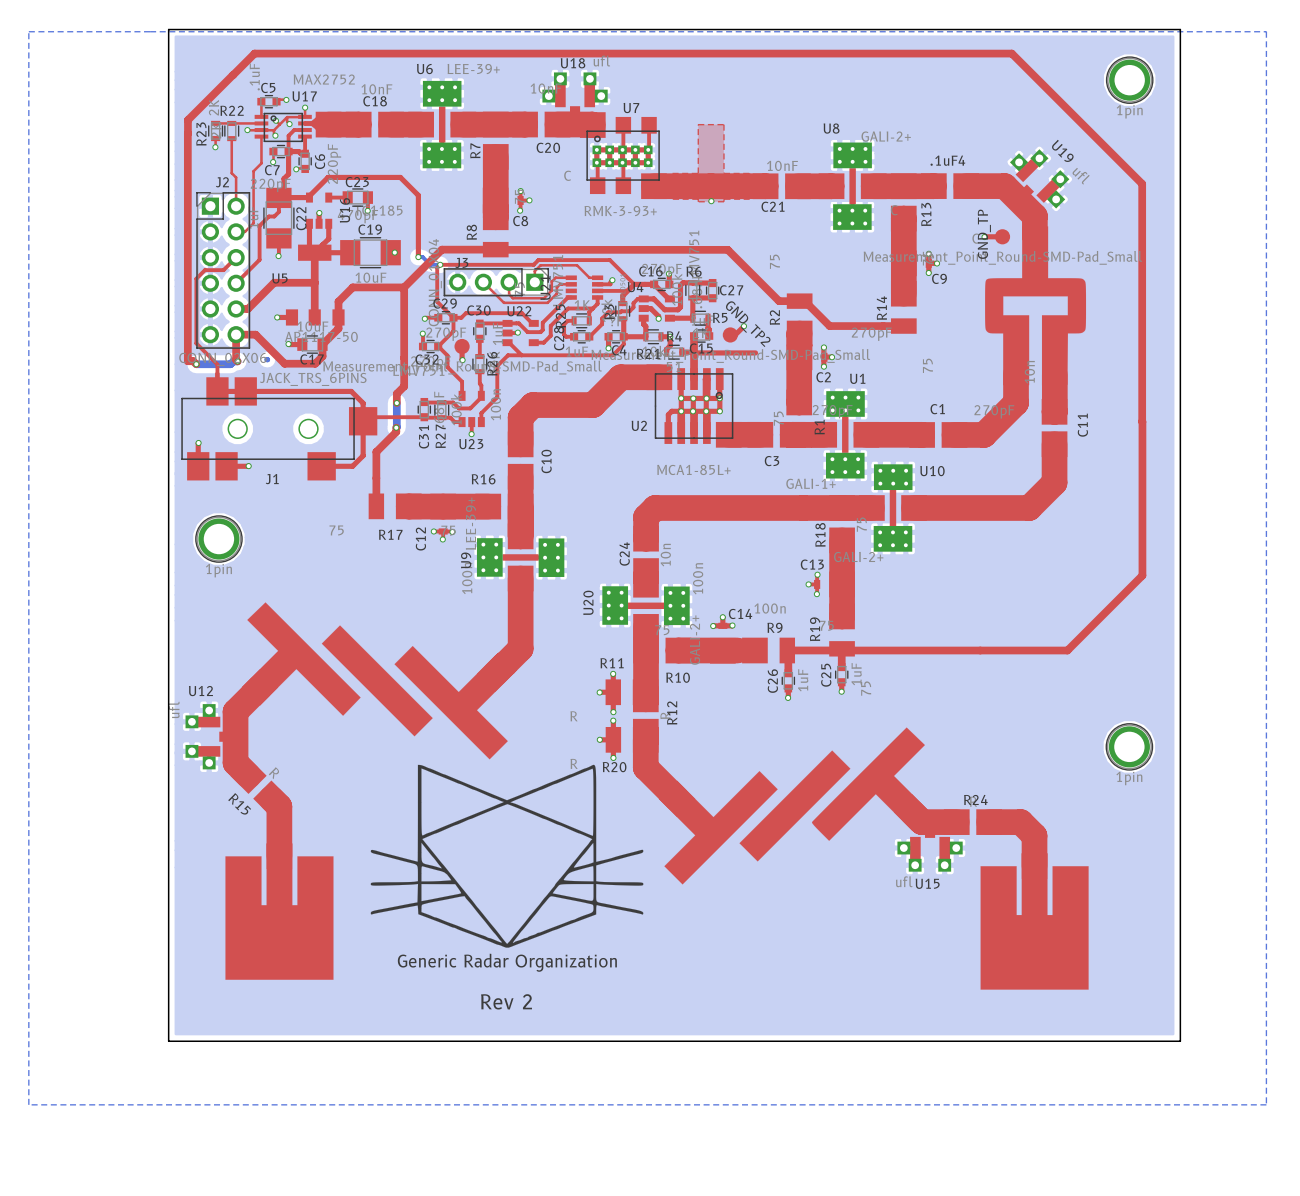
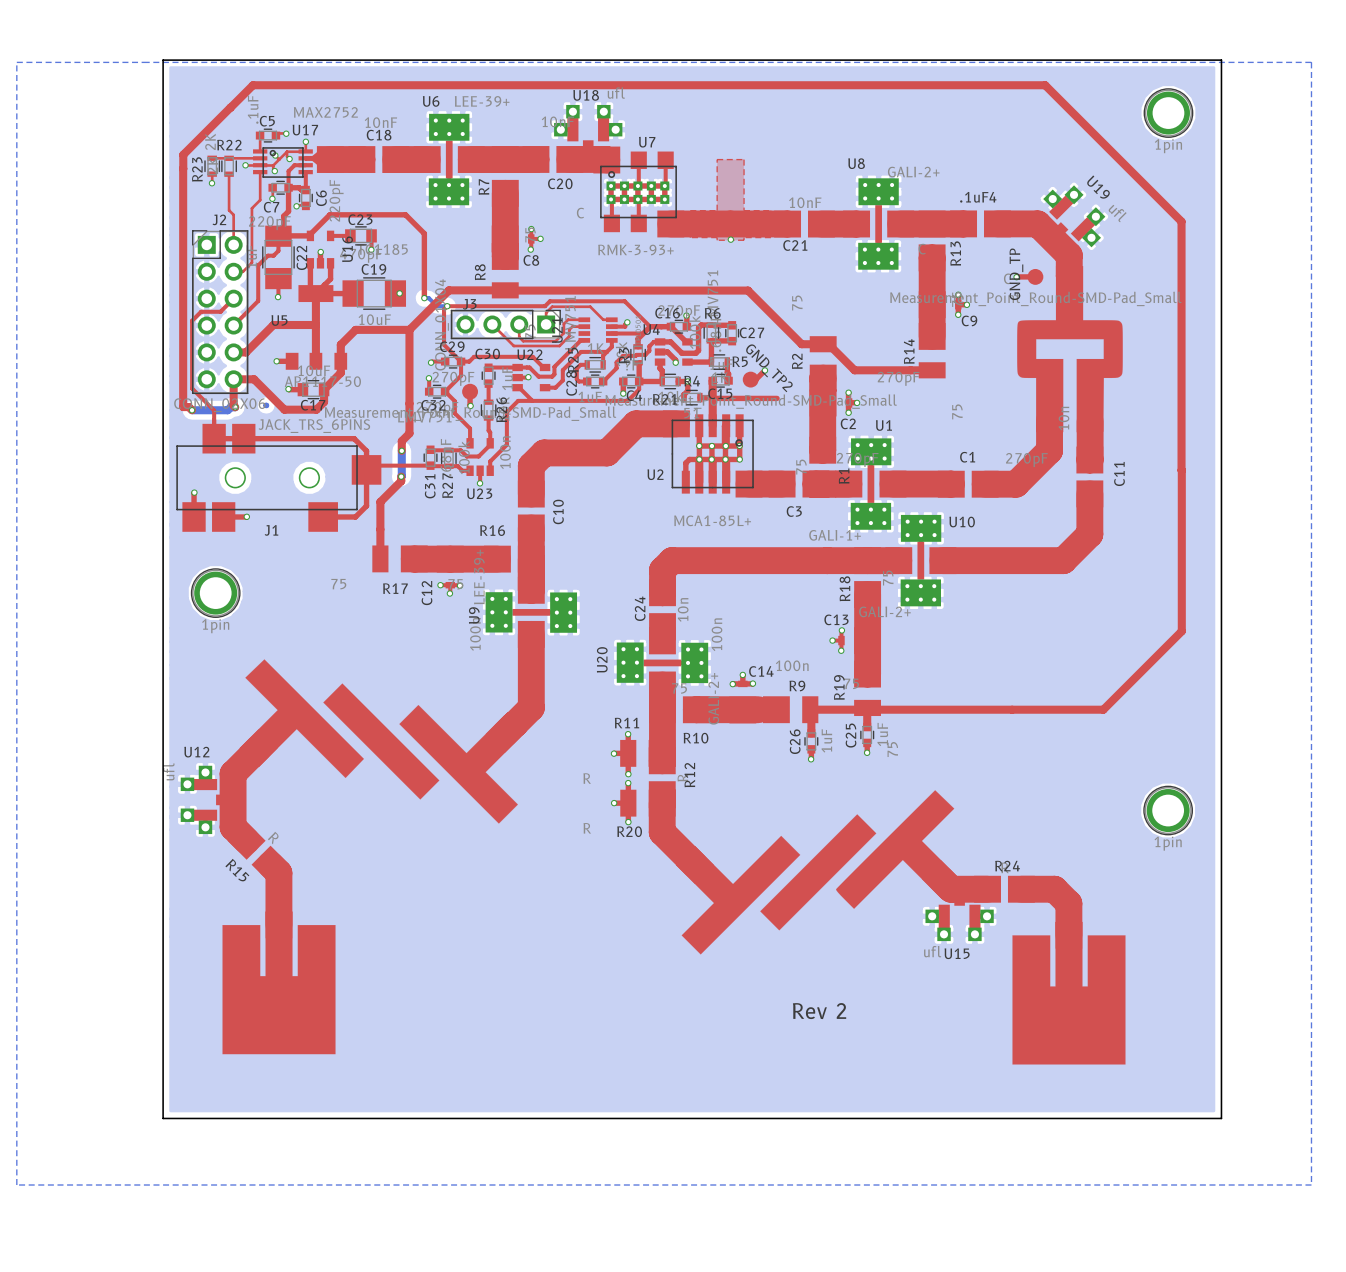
drawing: [370, 764, 644, 948] -> none
text: none -> Rev 2 (819, 1011)
text: Rev 2 (506, 1001) -> none

